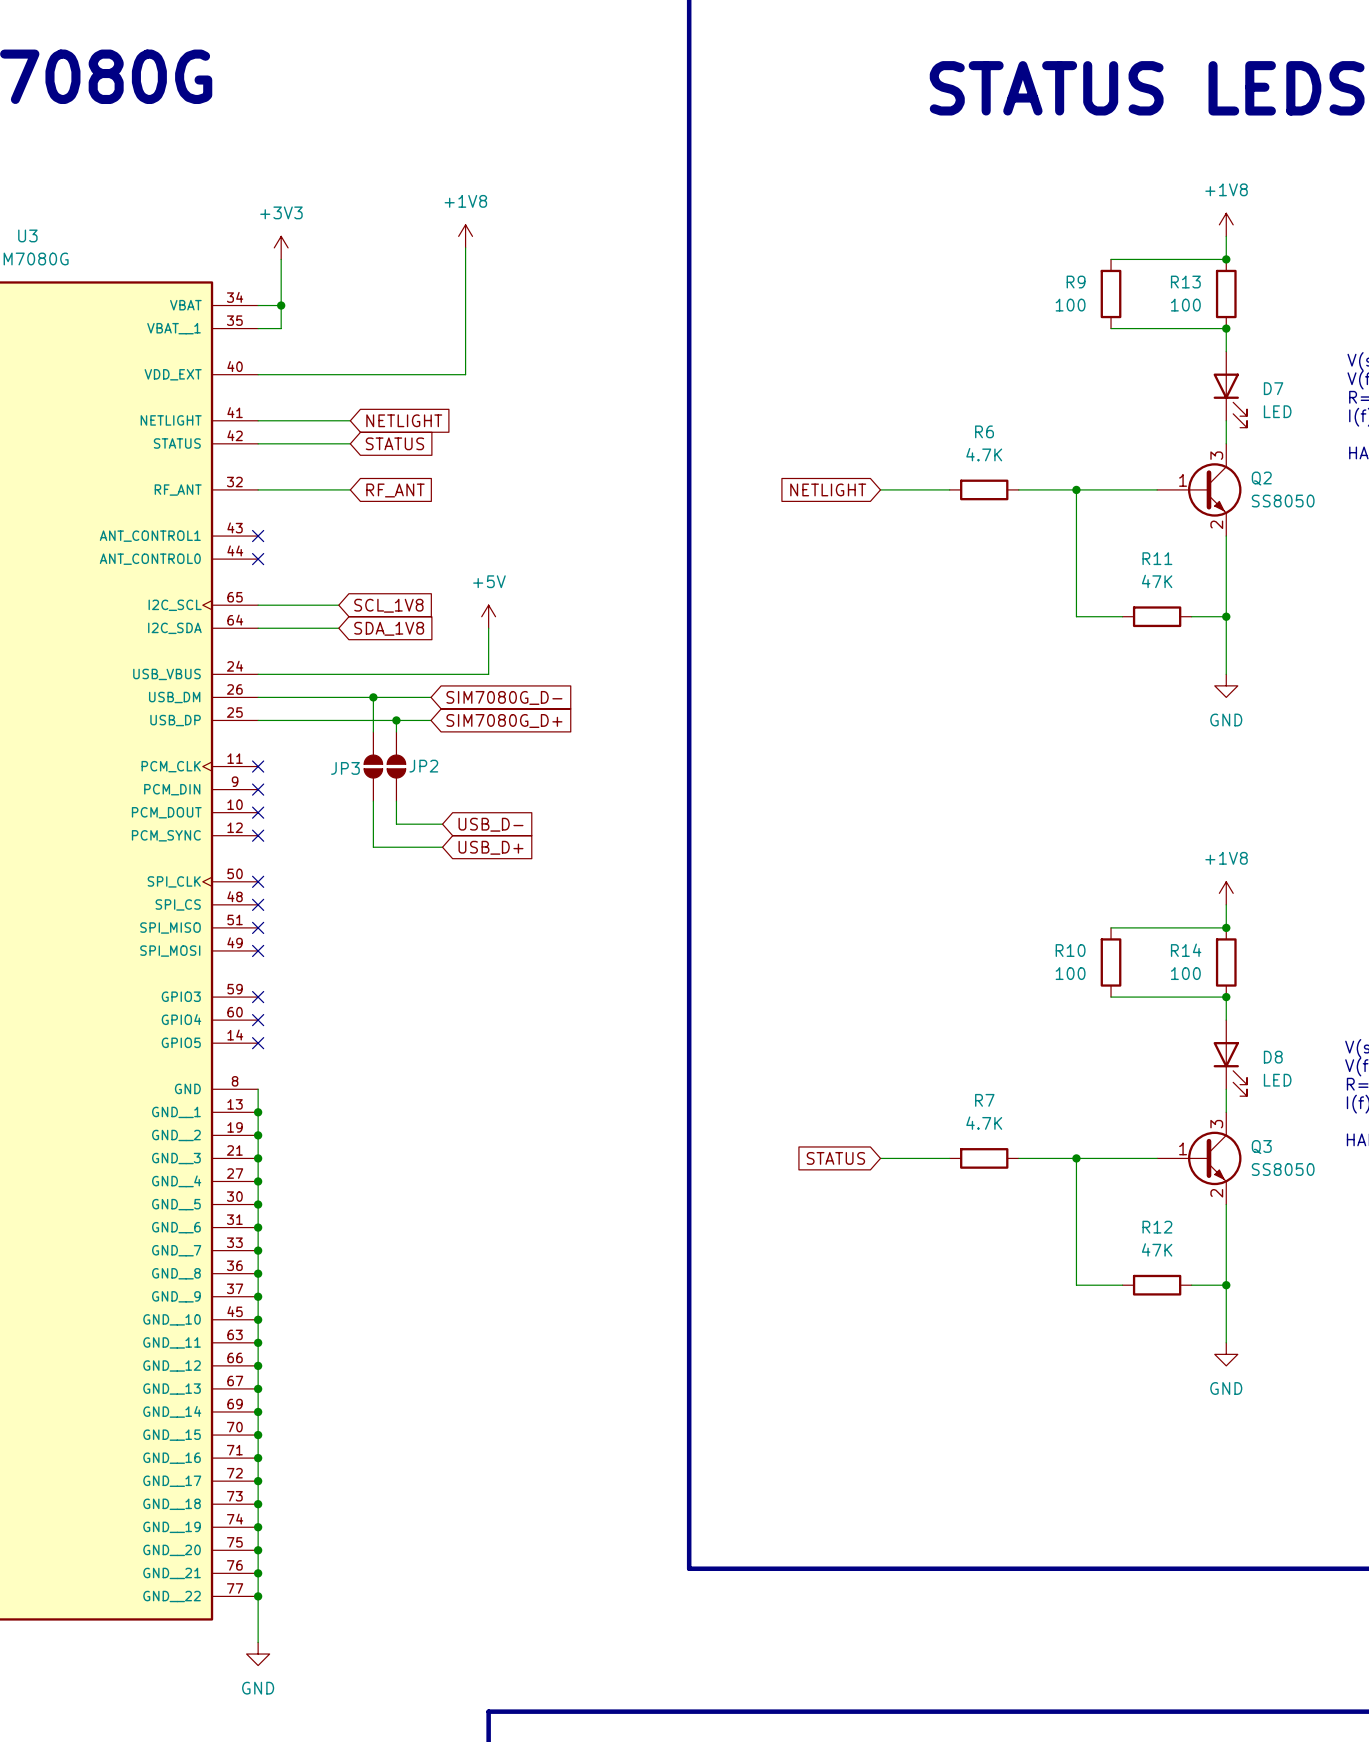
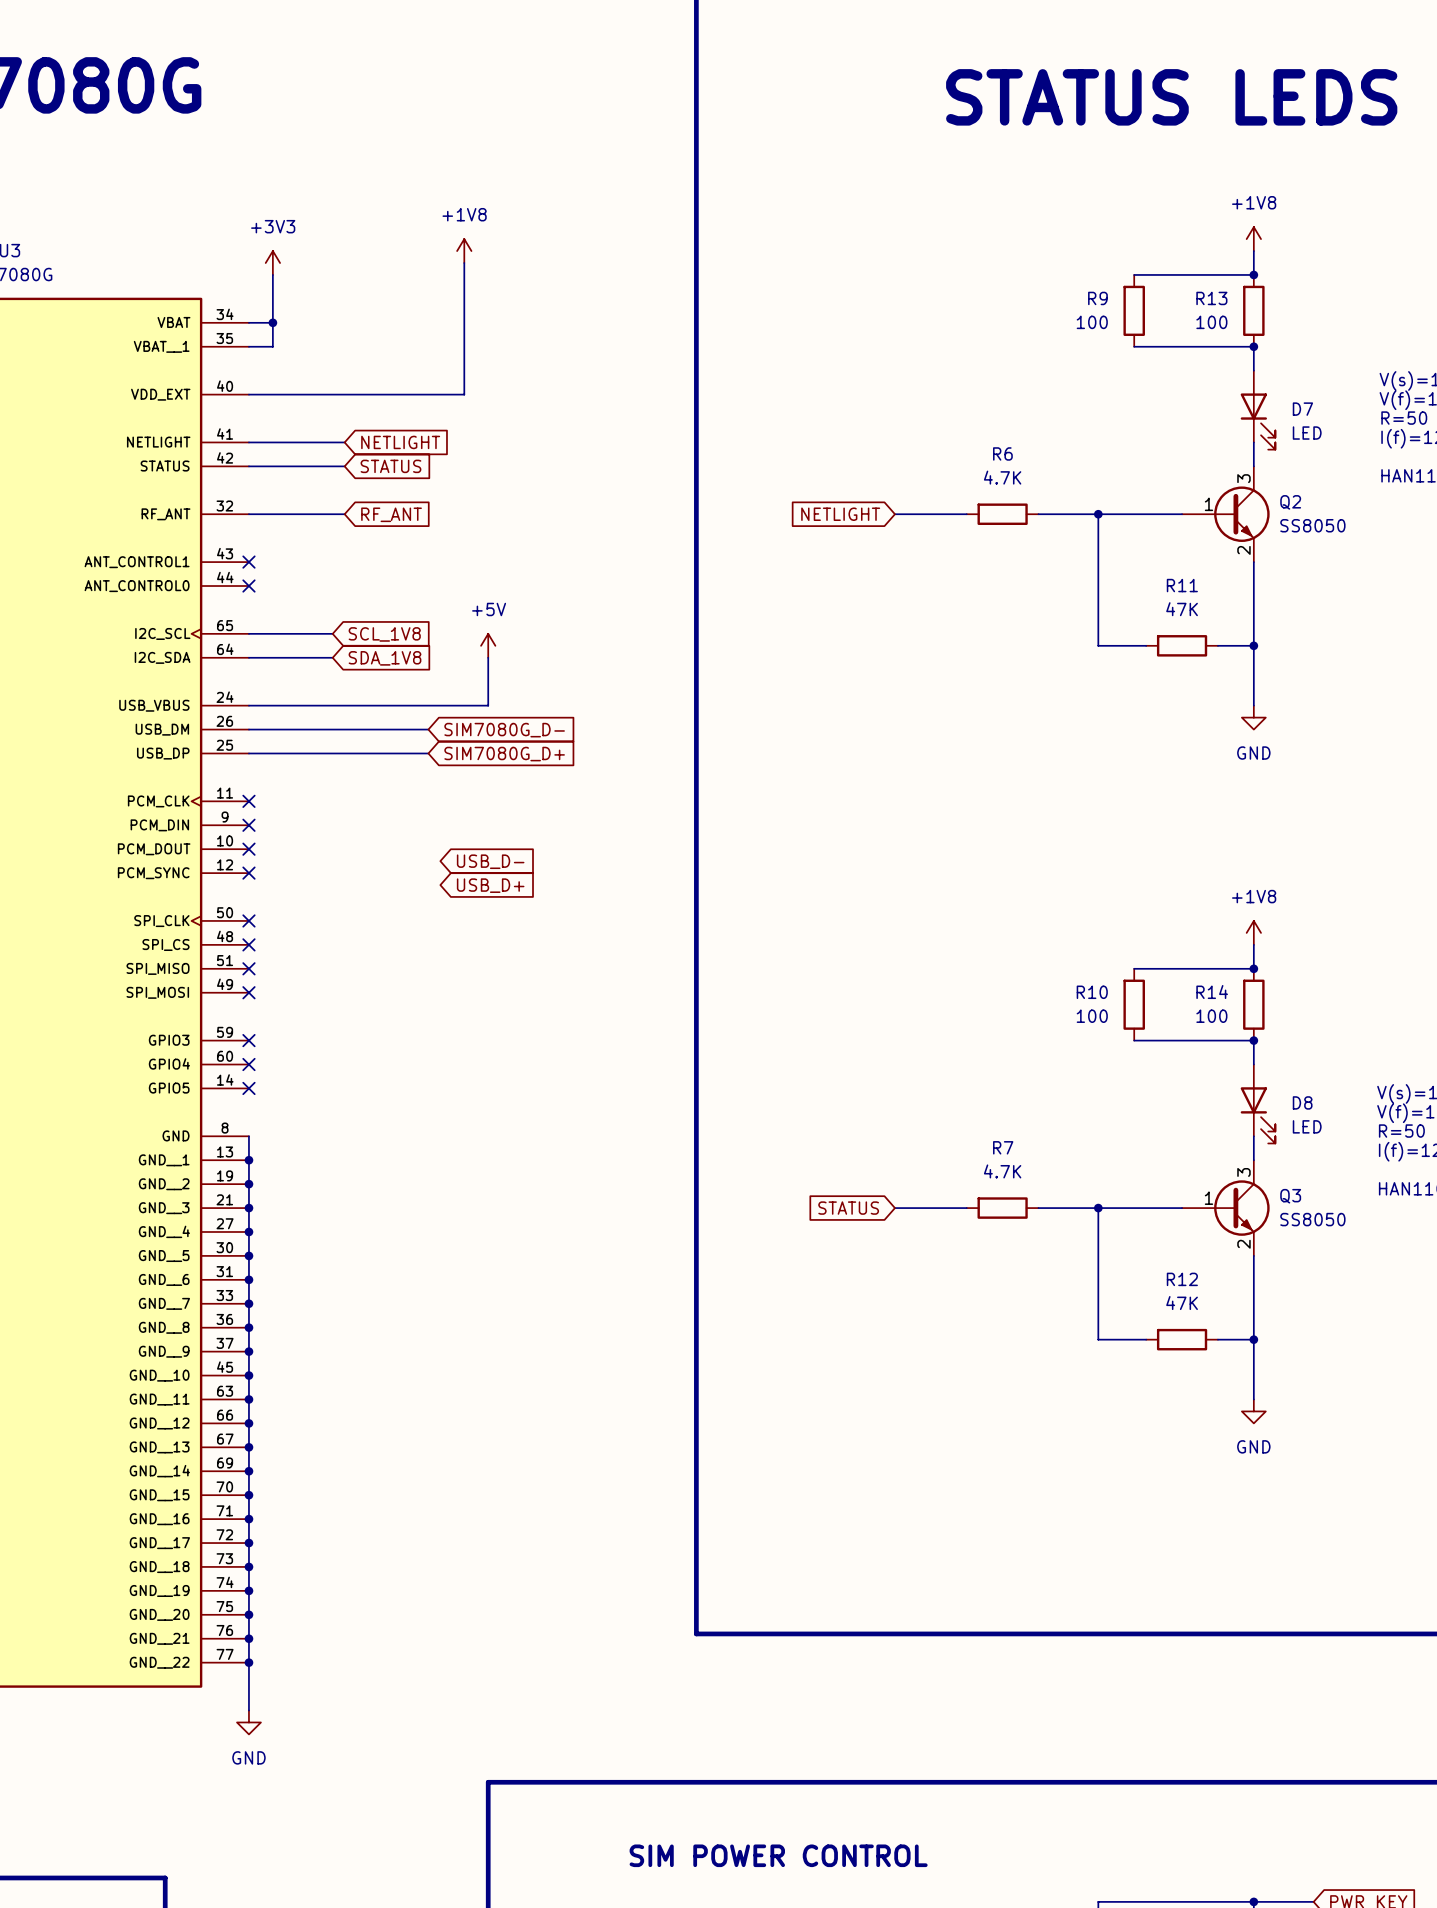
wire: (373, 697) (373, 731) -> none
junction: (373, 697) -> none
wire: (396, 720) (396, 731) -> none
junction: (396, 720) -> none
JP3: (373, 766) -> none
JP2: (396, 766) -> none
wire: (373, 801) (373, 847) (442, 847) -> none
wire: (396, 801) (396, 824) (442, 824) -> none

